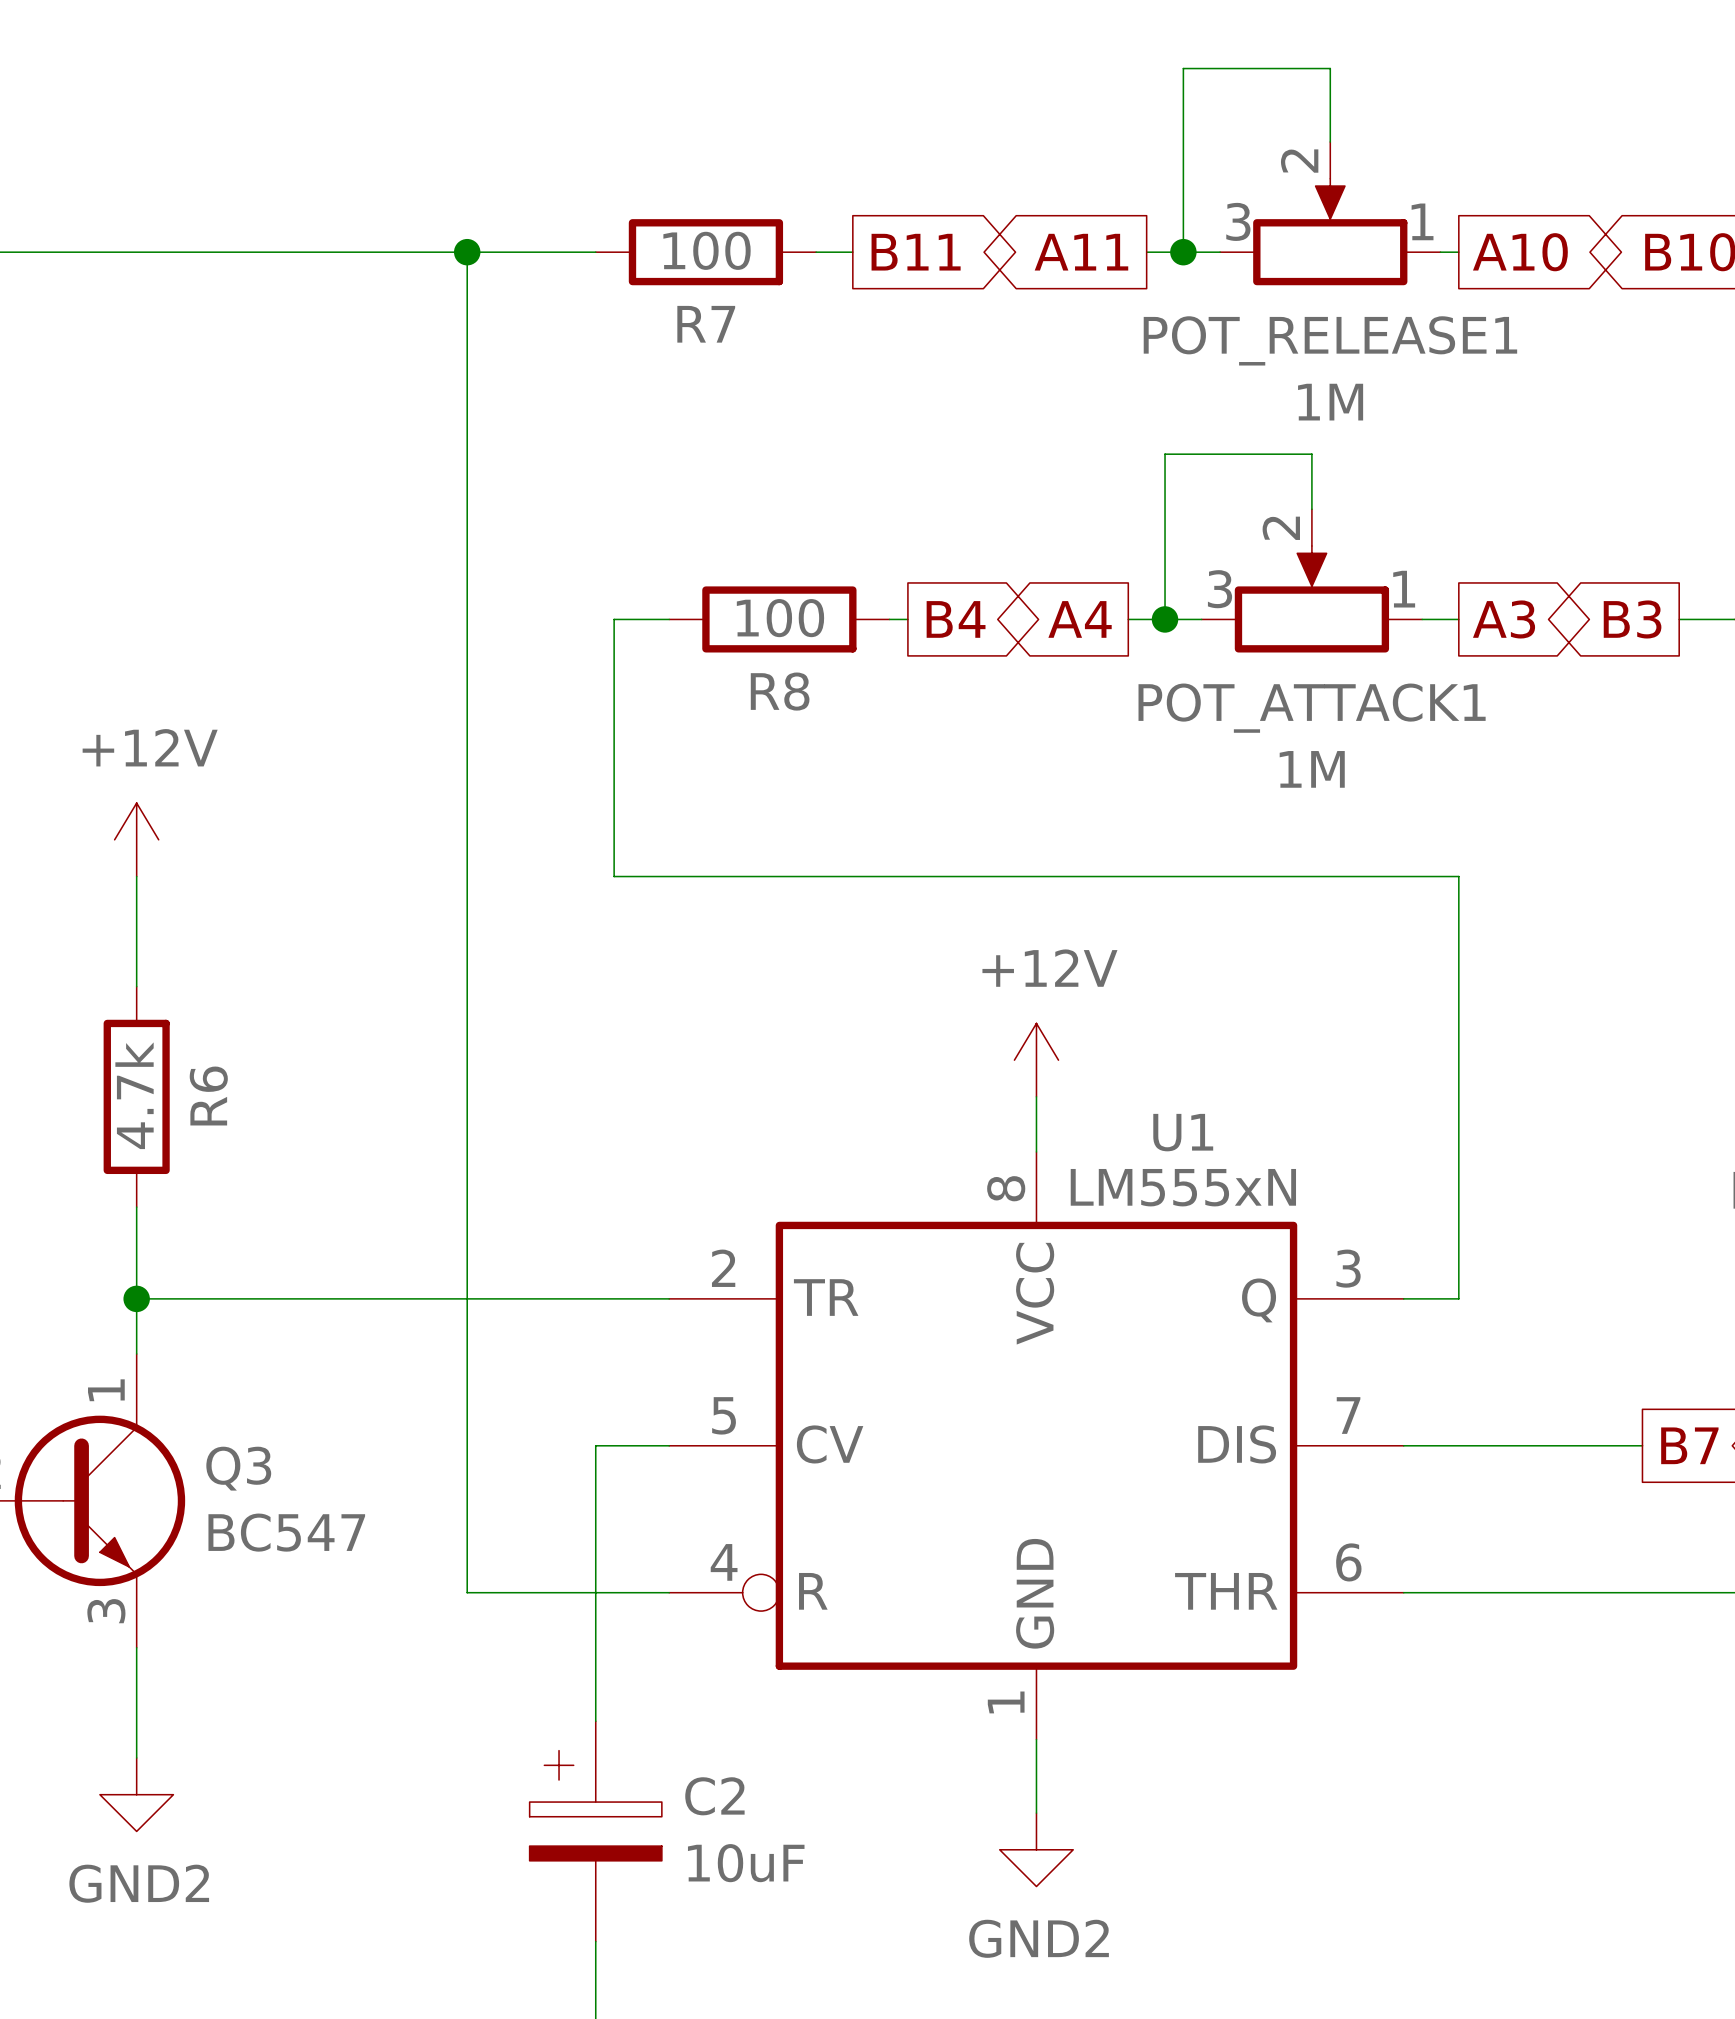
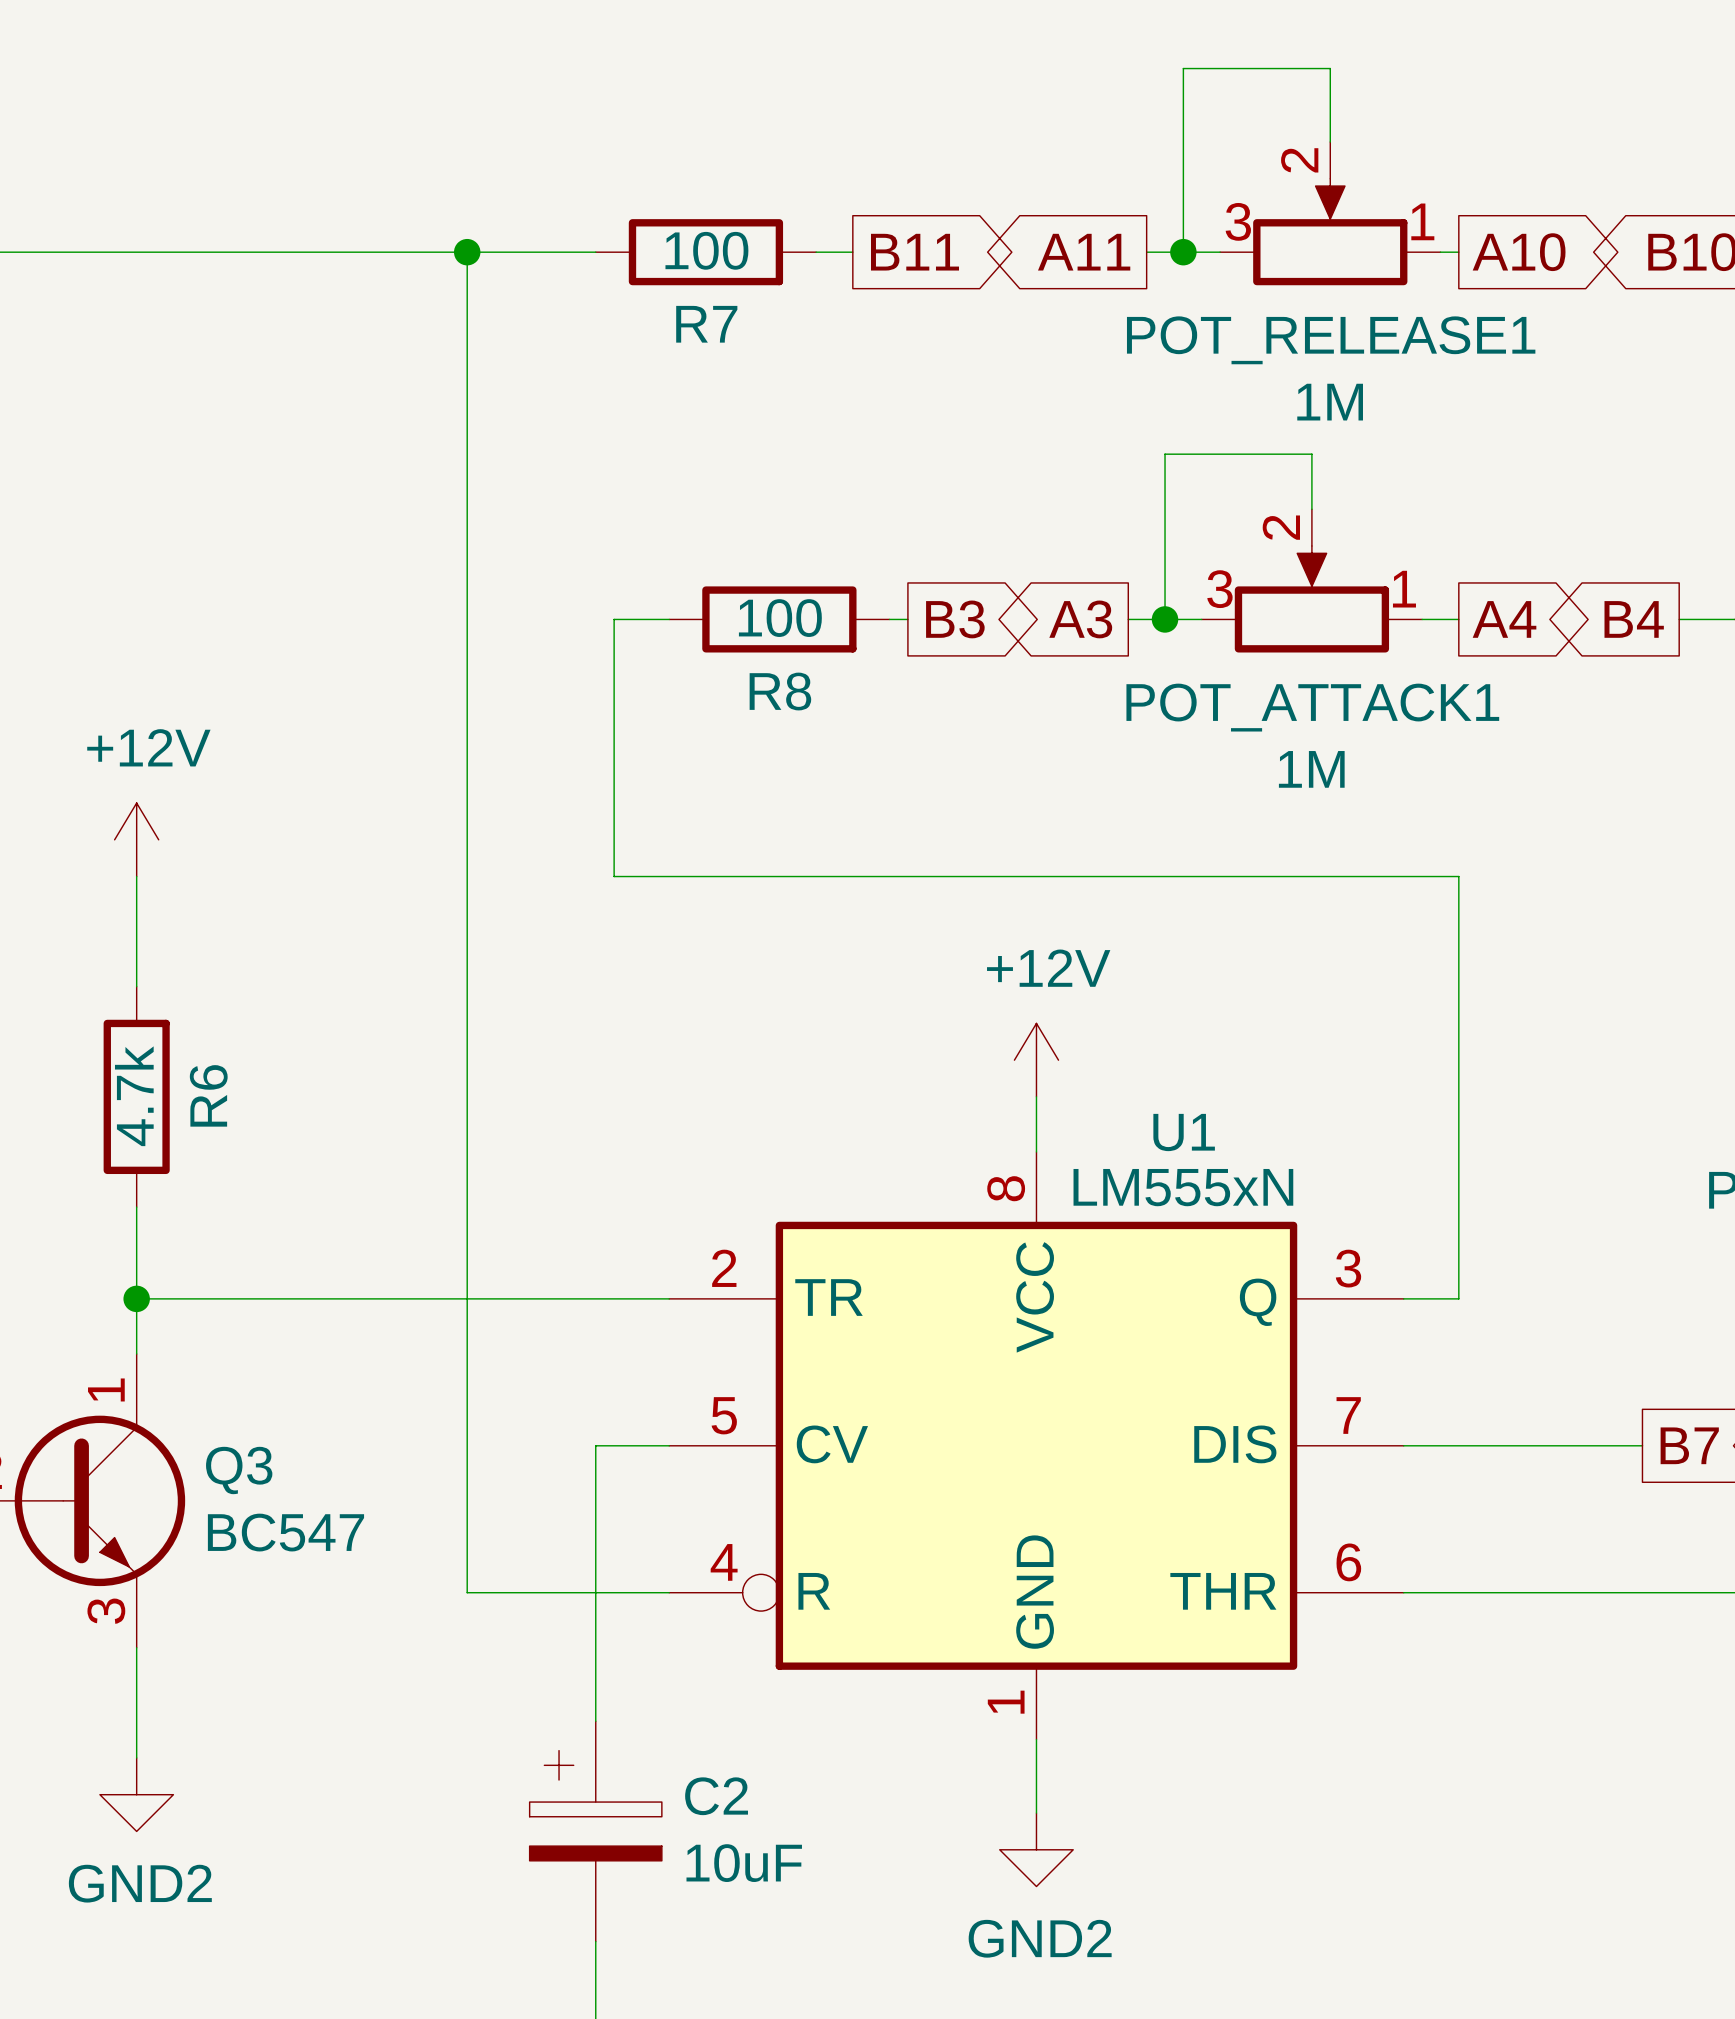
global label: B4 (956, 619) -> B3 (955, 619)
global label: A4 (1080, 619) -> A3 (1080, 619)
global label: A3 (1504, 619) -> A4 (1504, 619)
global label: B3 (1632, 619) -> B4 (1634, 619)

